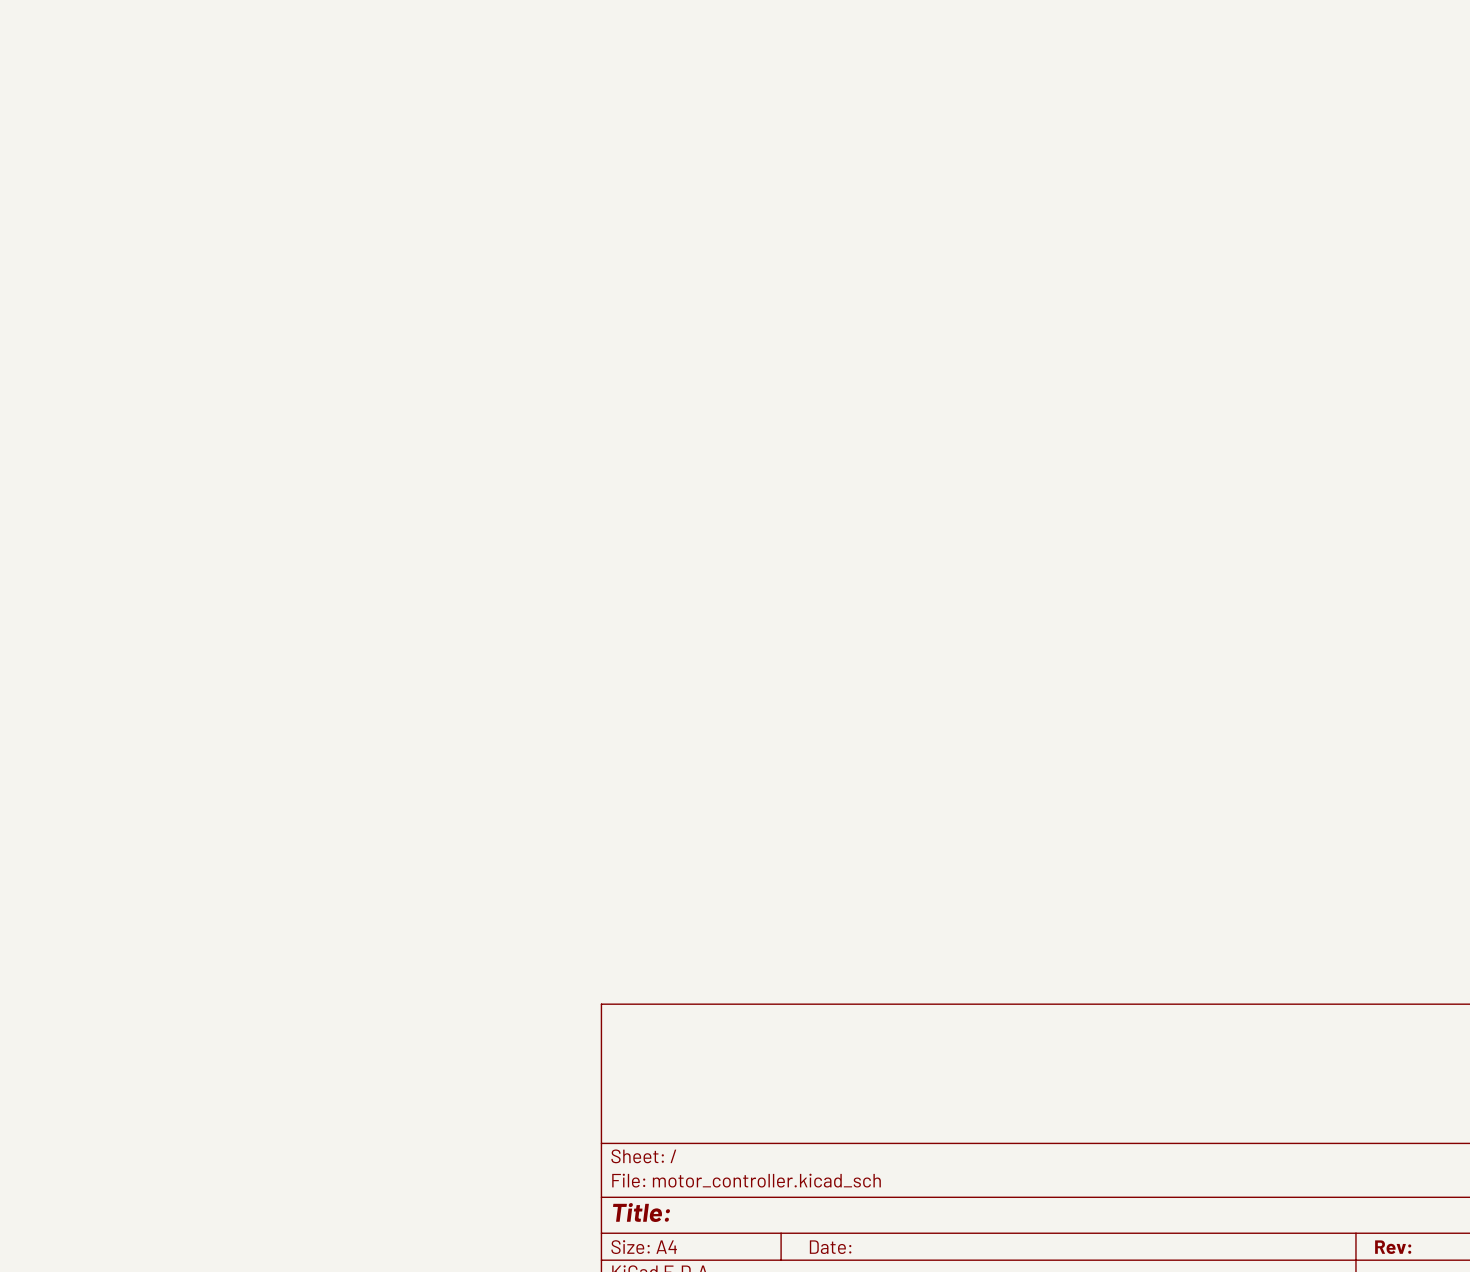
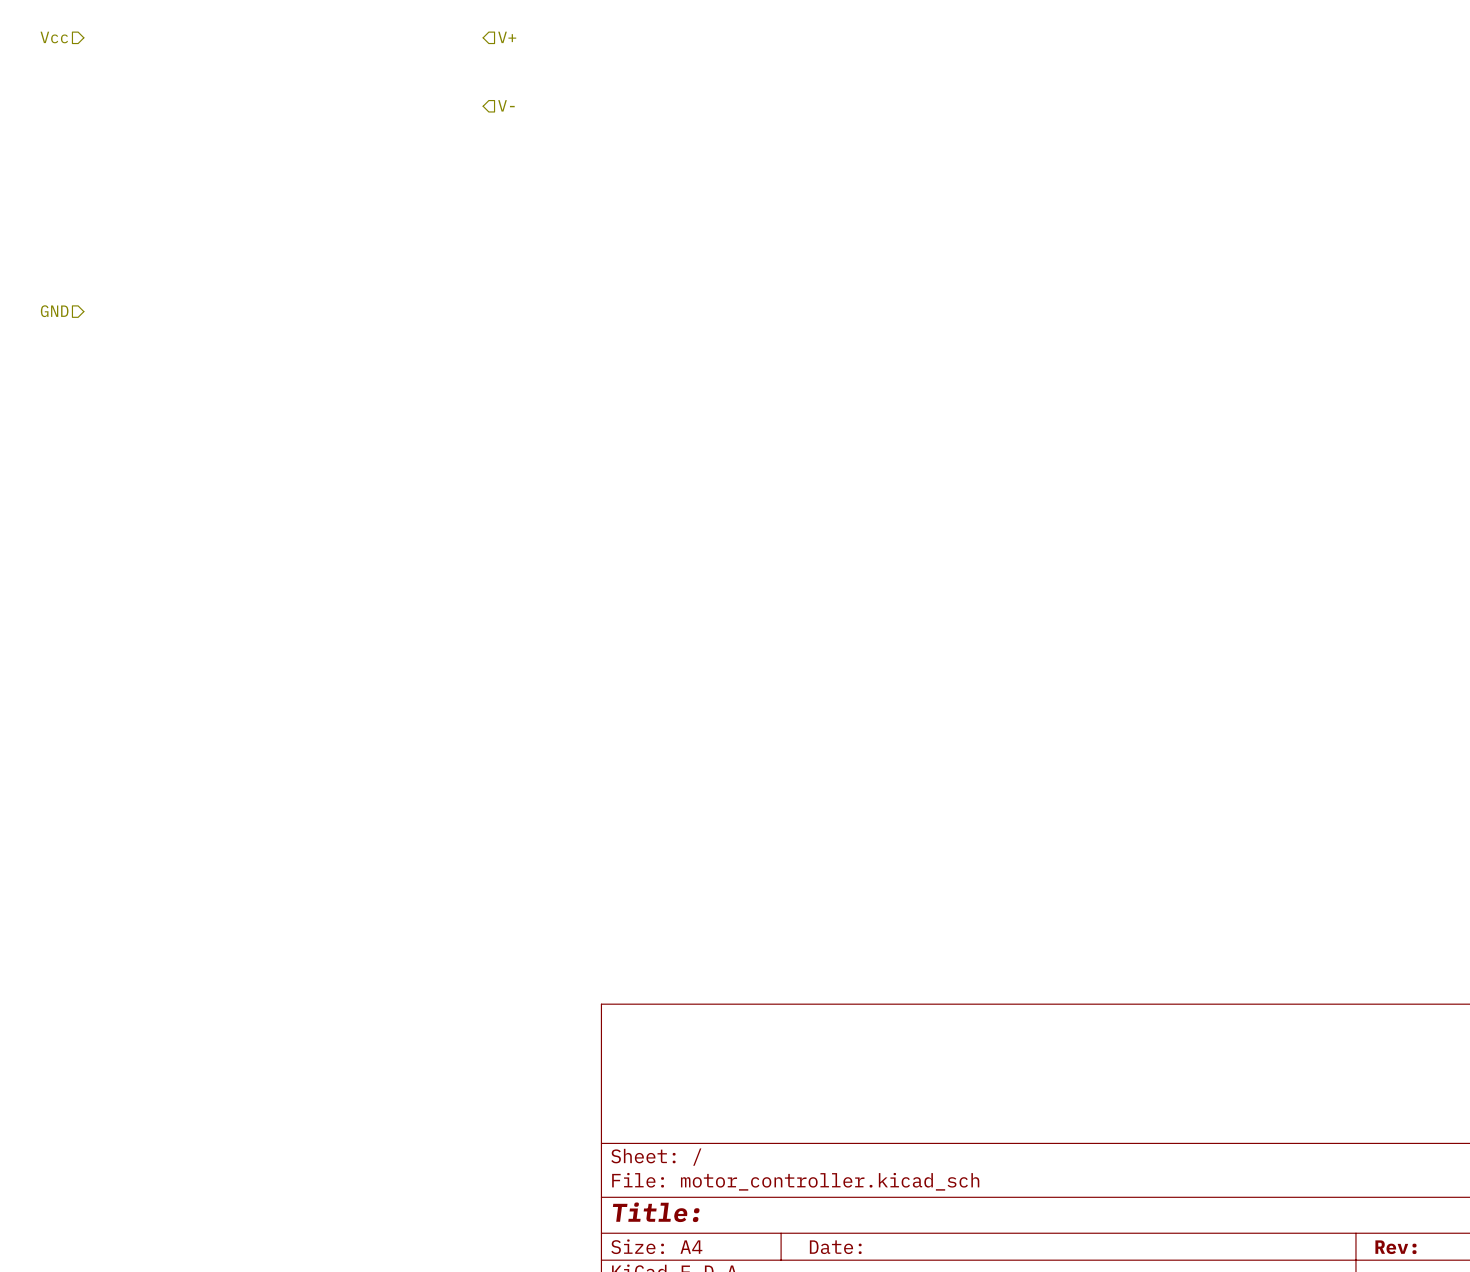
hierarchical label: none -> Vcc (54, 37)
hierarchical label: none -> V+ (507, 37)
hierarchical label: none -> V- (506, 105)
hierarchical label: none -> GND (54, 311)

